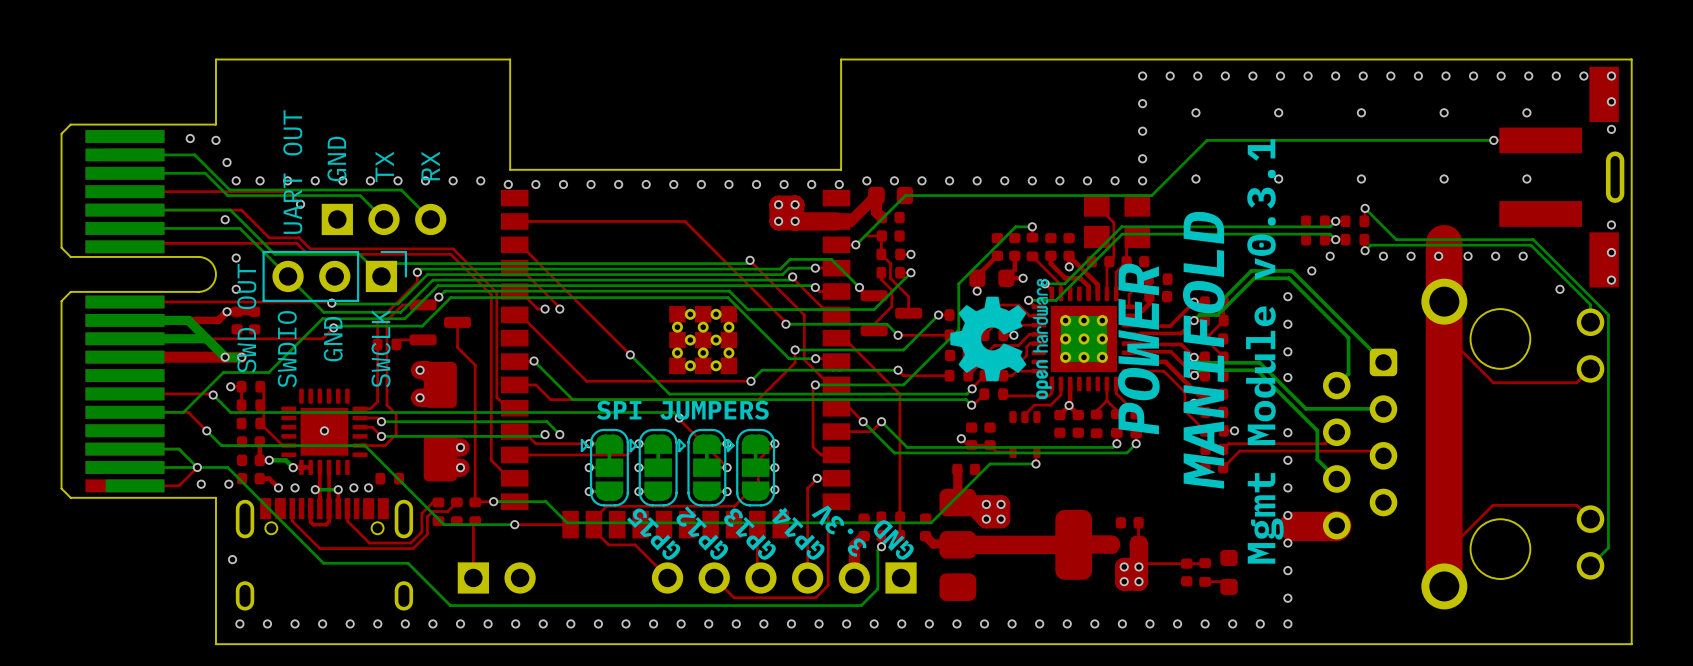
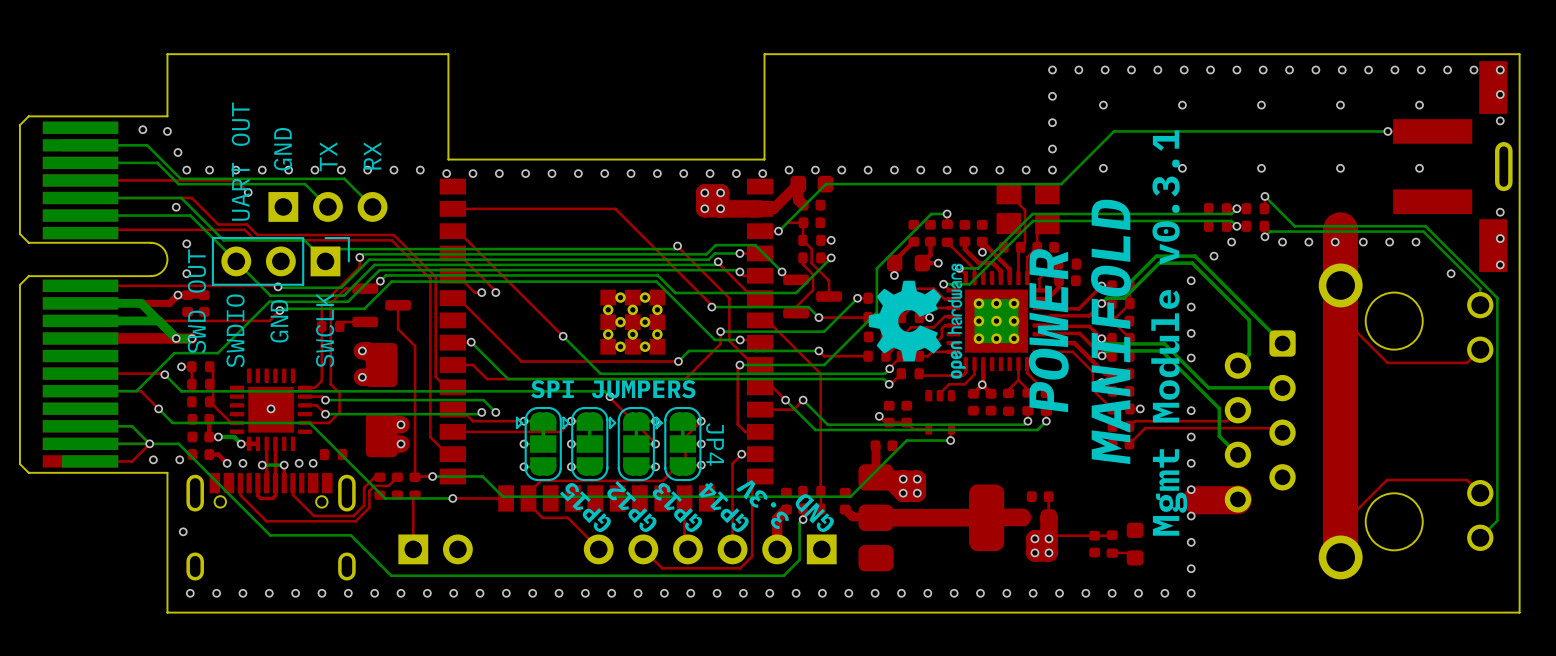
JP4 name: none -> JP4 (714, 444)

